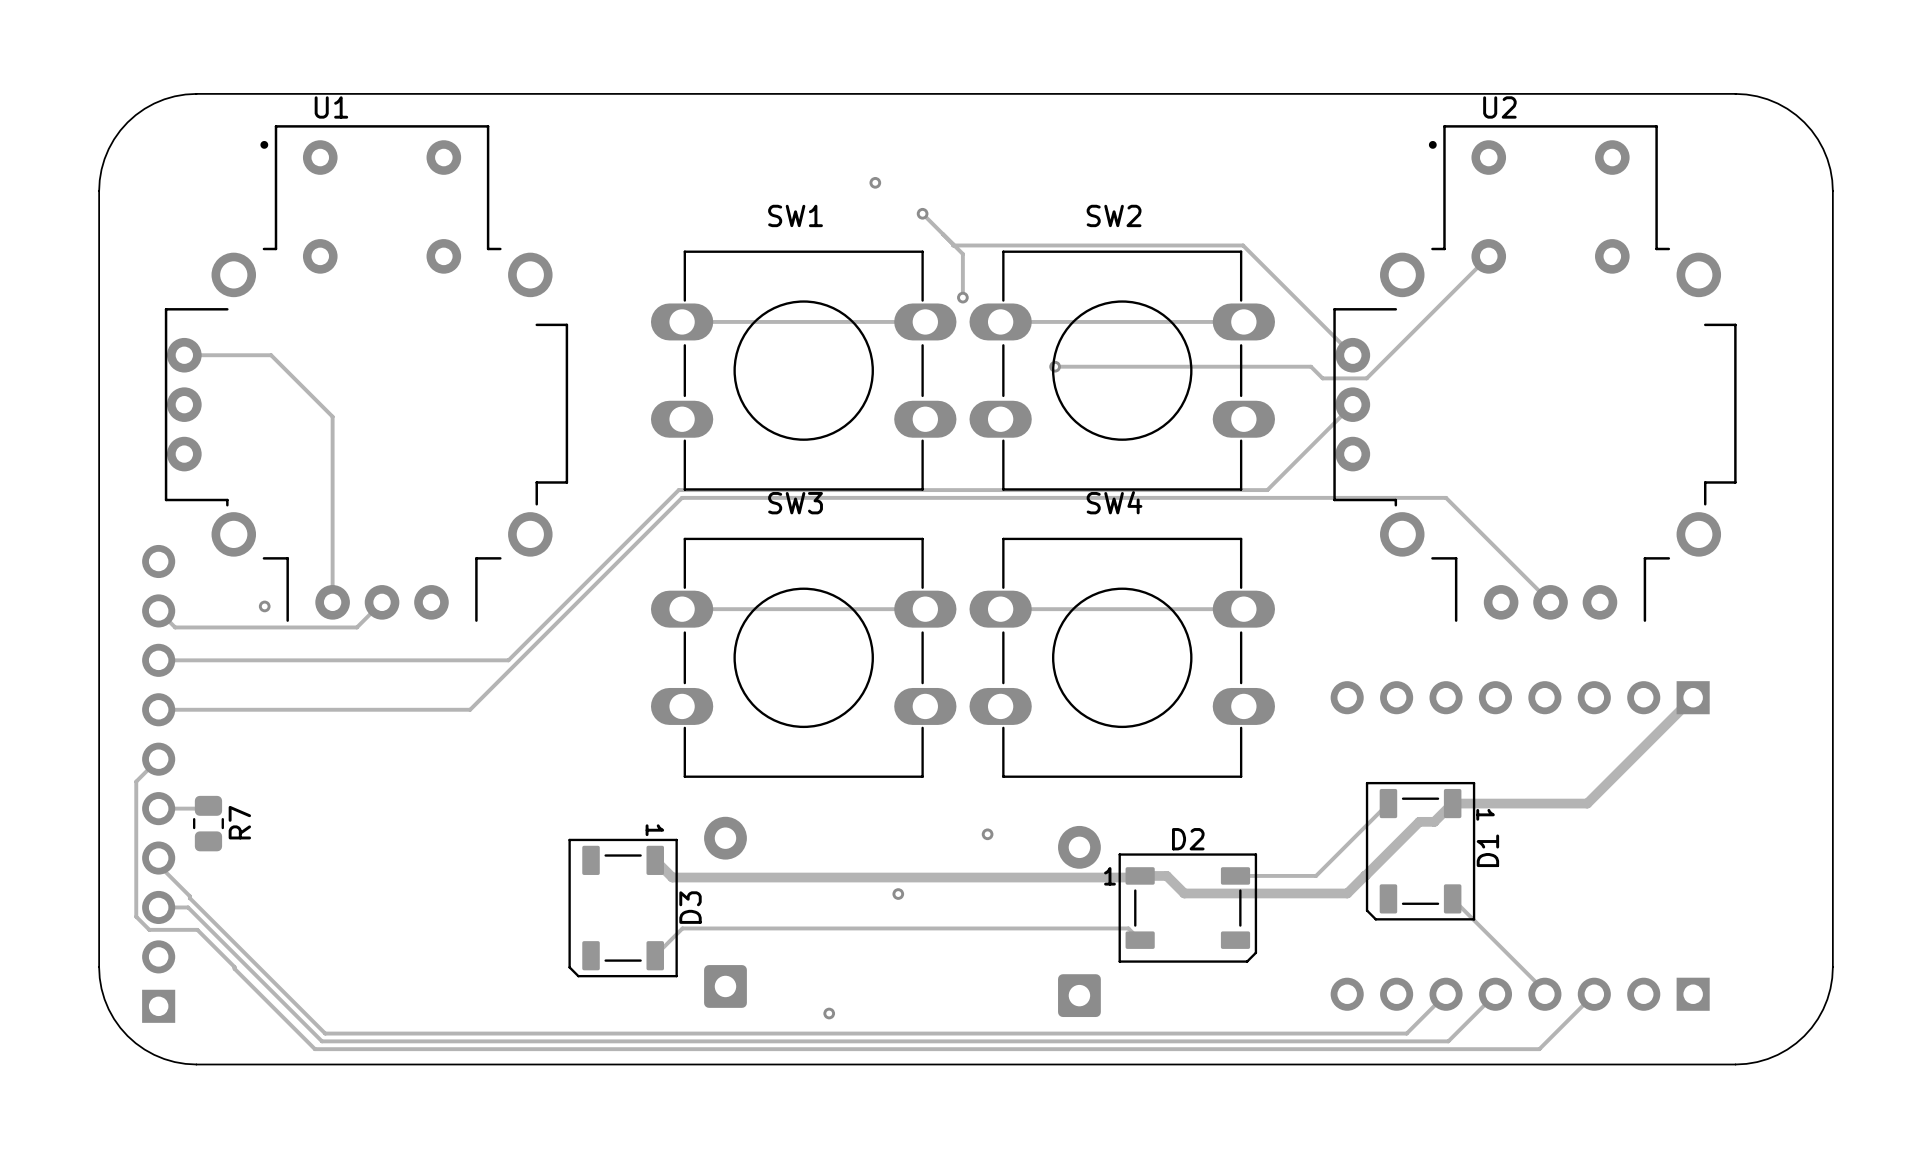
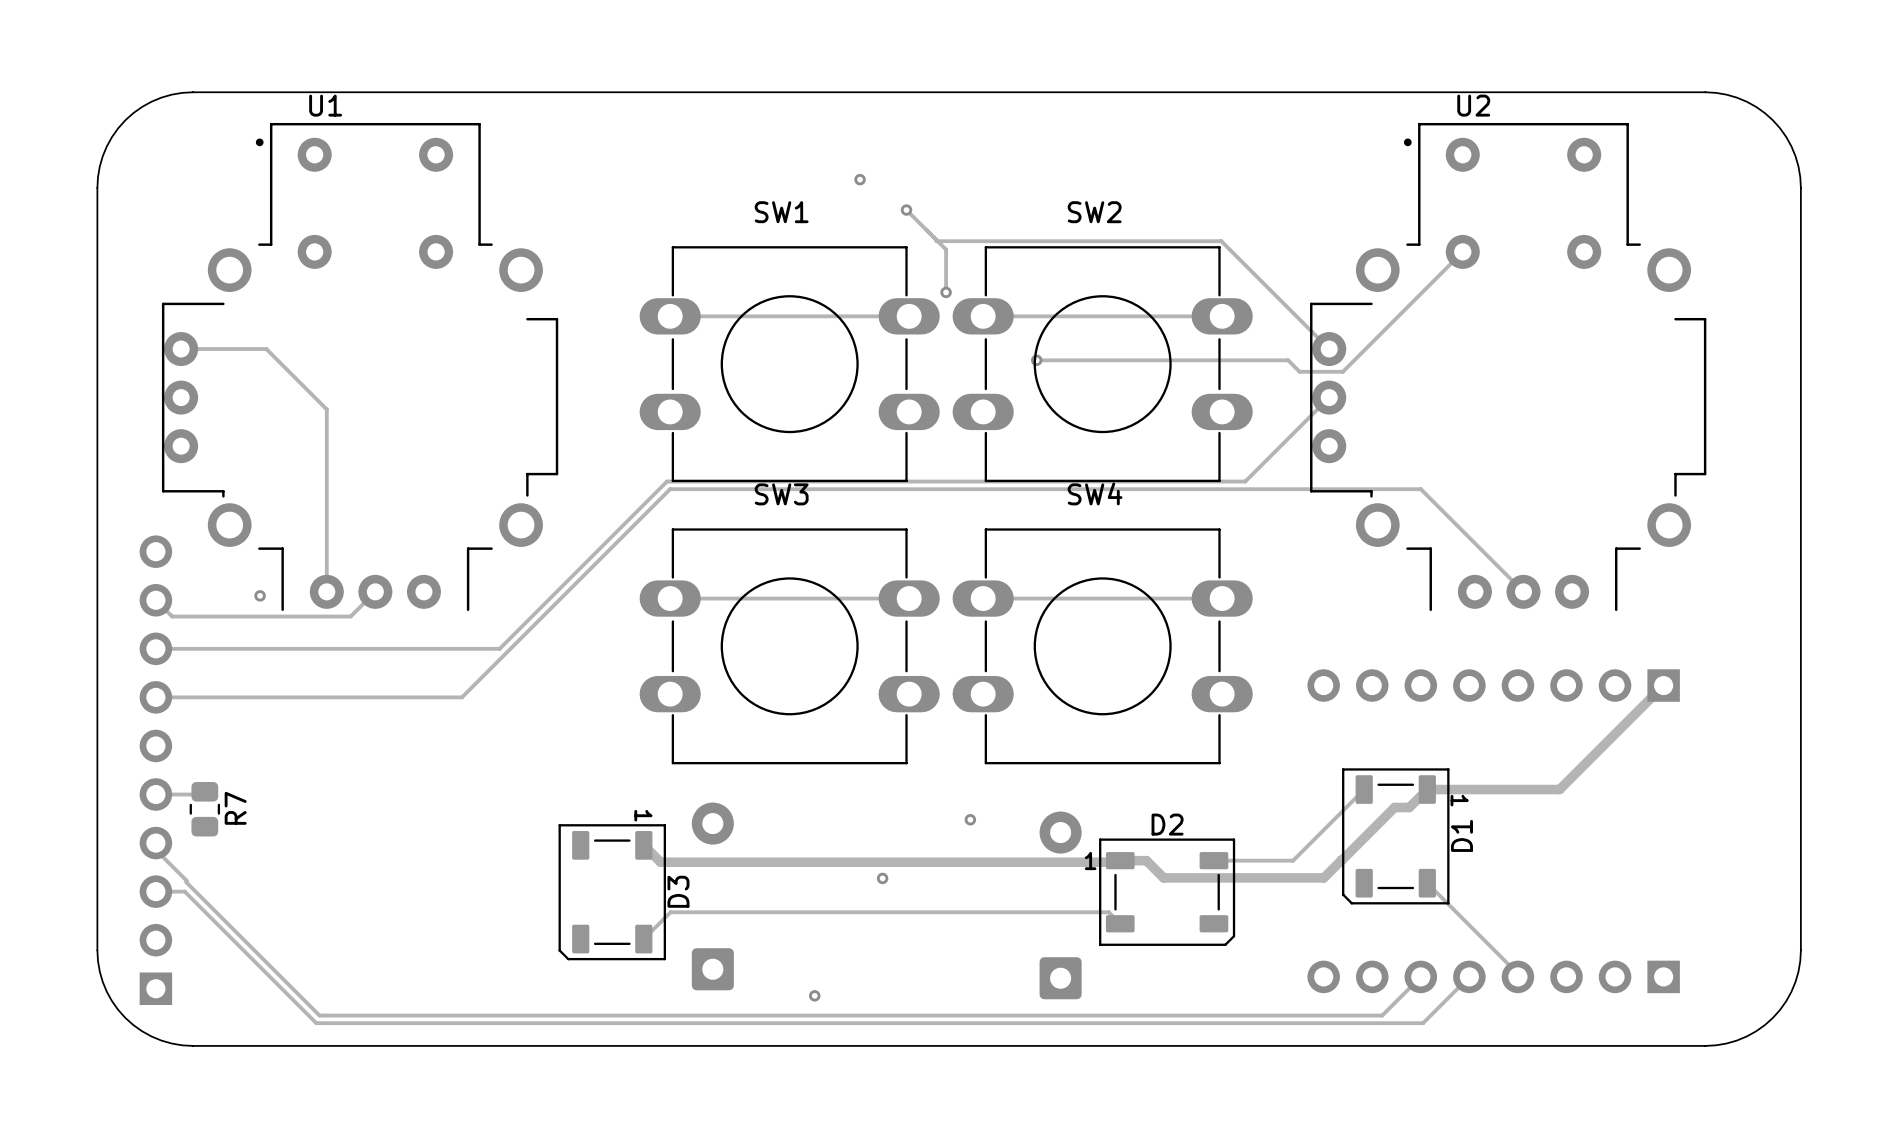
track: (158, 759) (136, 781) (136, 916) (149, 929) (197, 929) (314, 1049) (1539, 1049) (1594, 994) -> none

